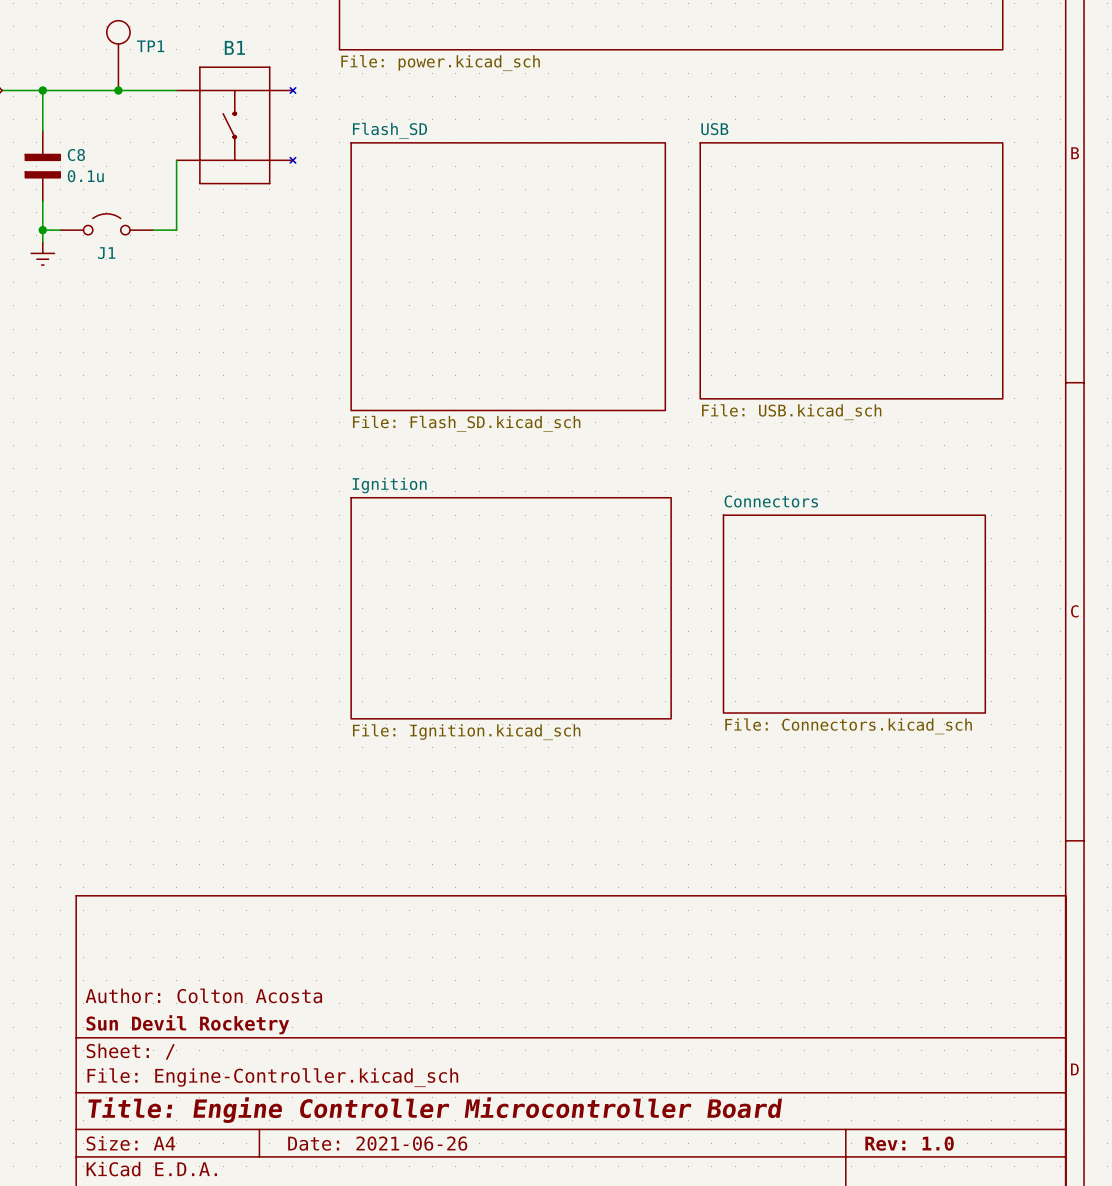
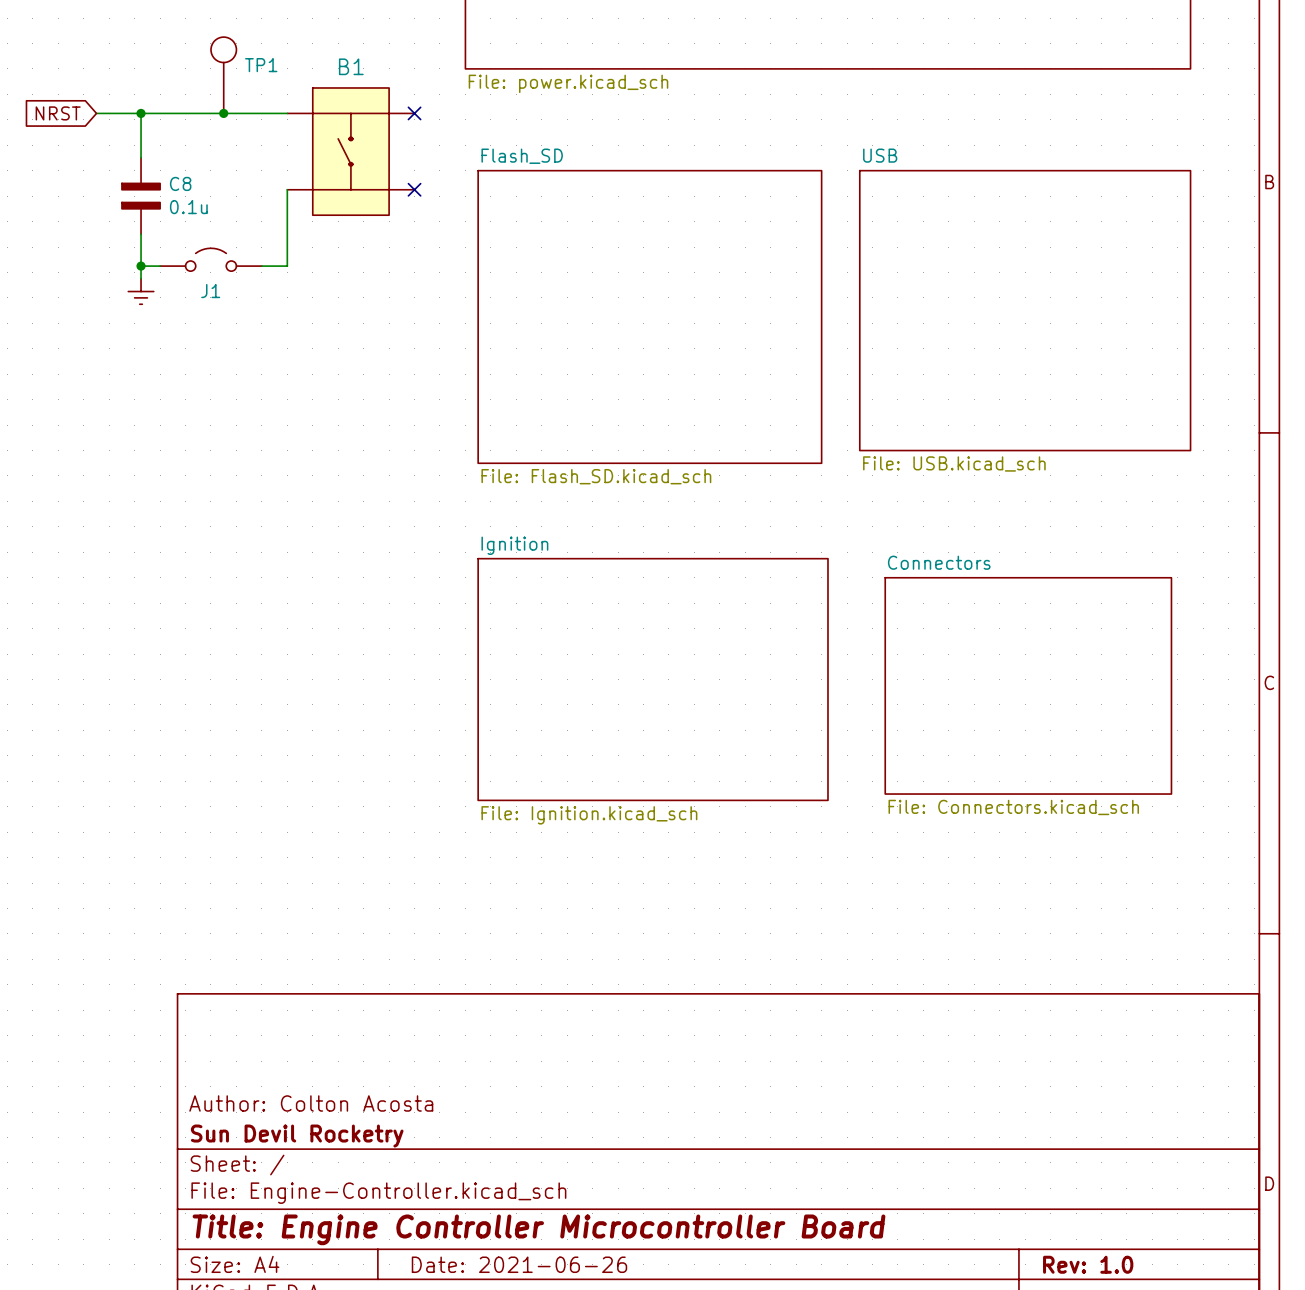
B1 symbol: [176, 66, 296, 185] -> [287, 87, 415, 216]
no-connect mark: none -> (414, 113)
no-connect mark: none -> (414, 189)

